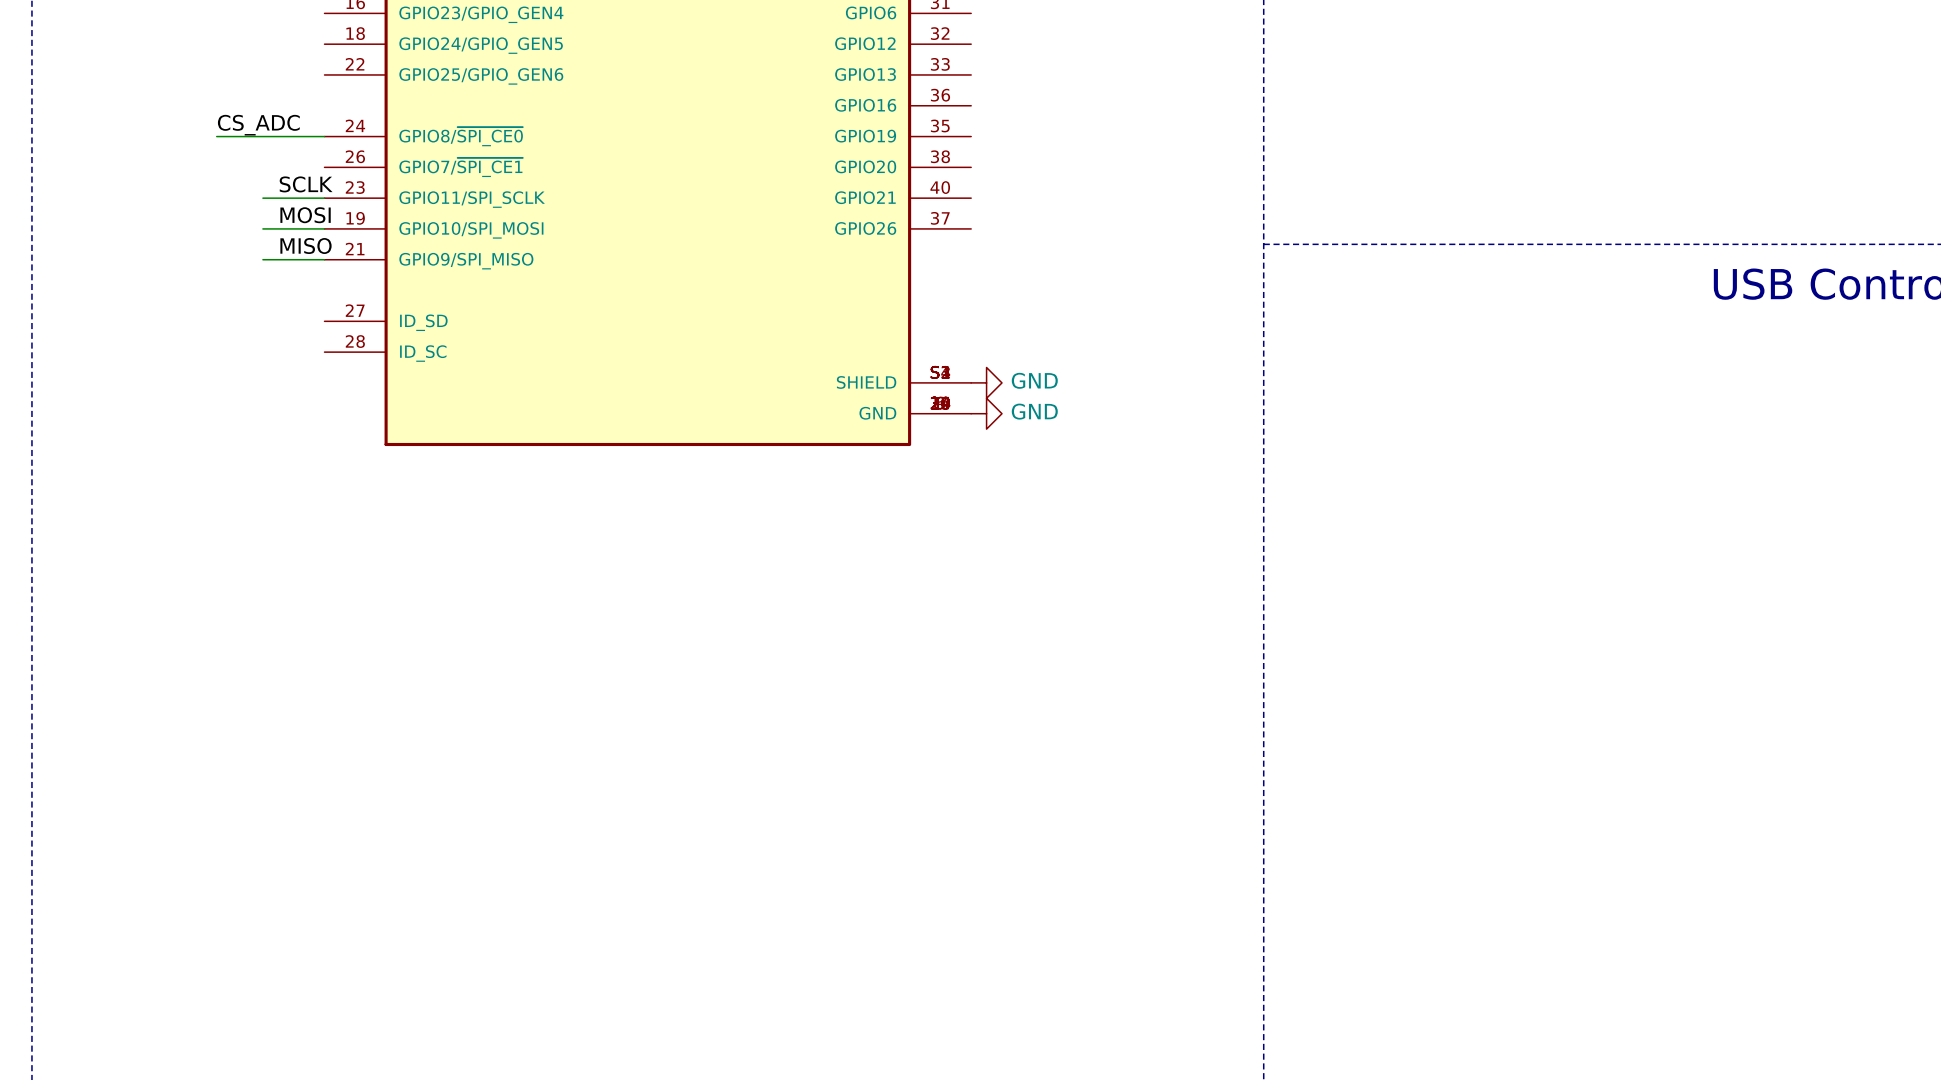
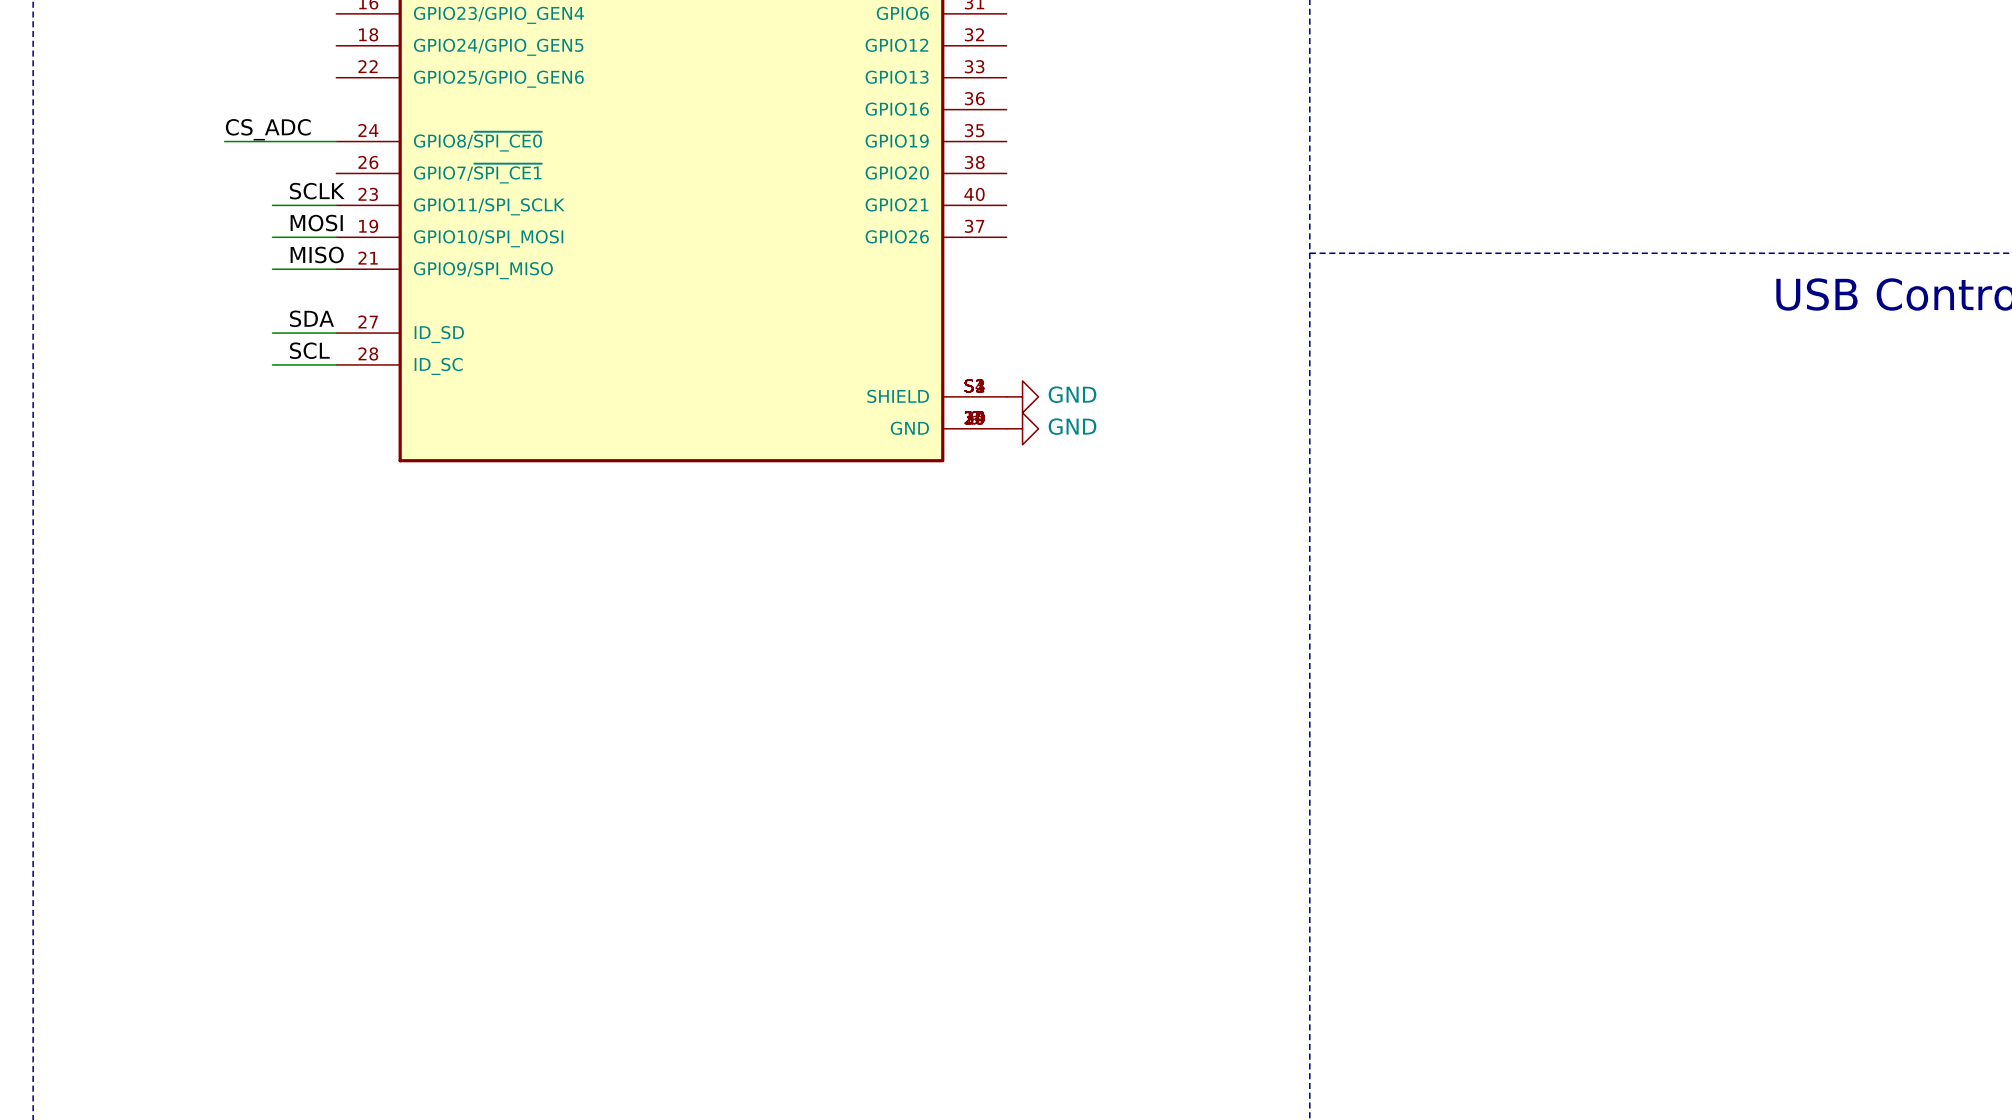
label: none -> SDA (311, 318)
wire: none -> (272, 333) (336, 333)
label: none -> SCL (309, 350)
wire: none -> (272, 364) (336, 364)

